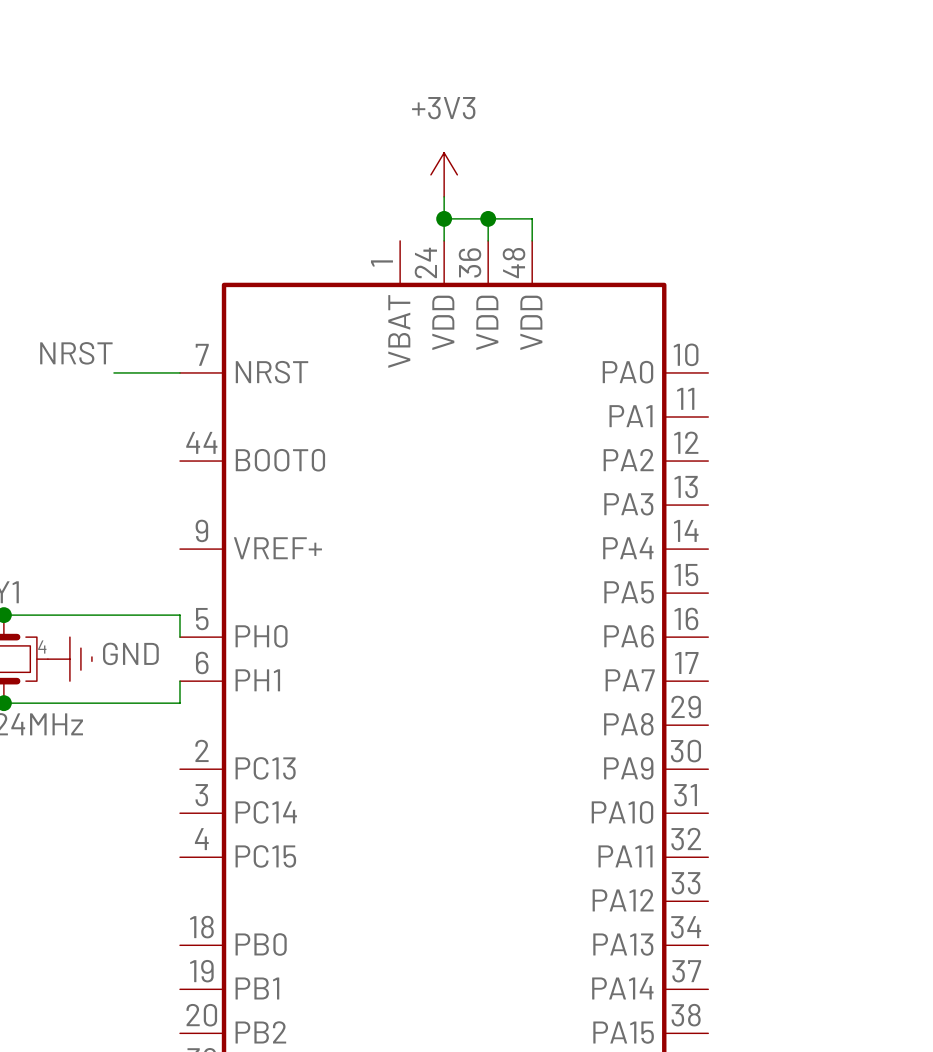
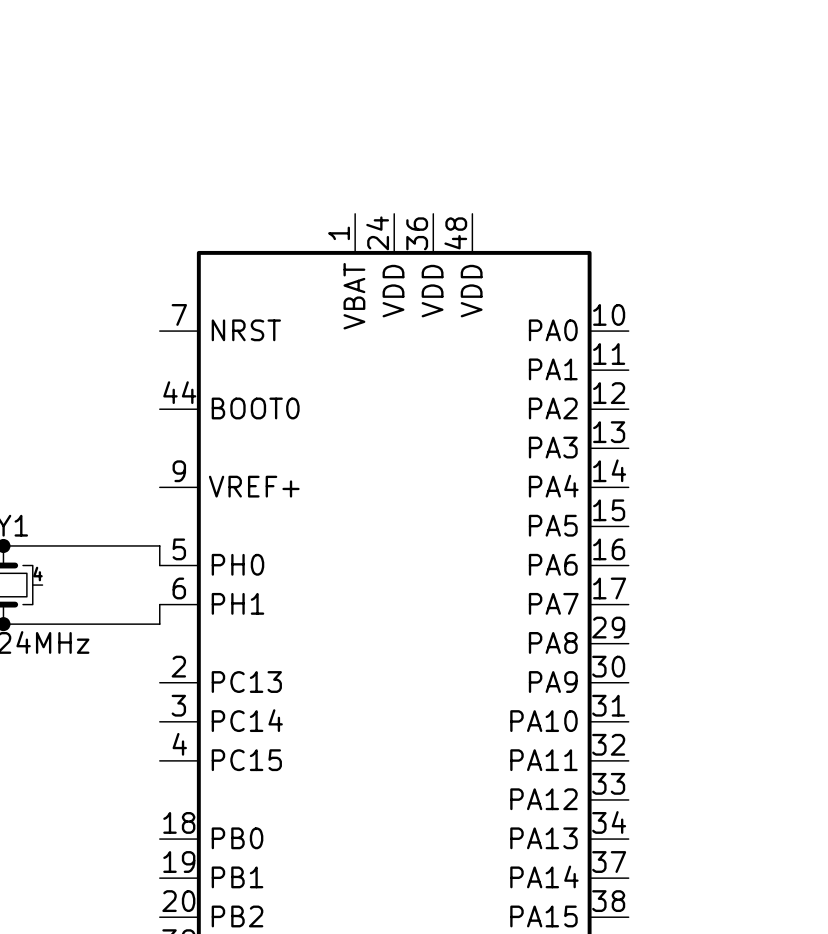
power symbol: +3V3 (444, 174) -> none
wire: (444, 196) (444, 240) -> none
wire: (444, 218) (532, 218) (532, 240) -> none
junction: (444, 218) -> none
wire: (488, 218) (488, 240) -> none
junction: (488, 218) -> none
label: NRST (76, 353) -> none
wire: (113, 372) (179, 372) -> none
power symbol: GND (69, 659) -> none

